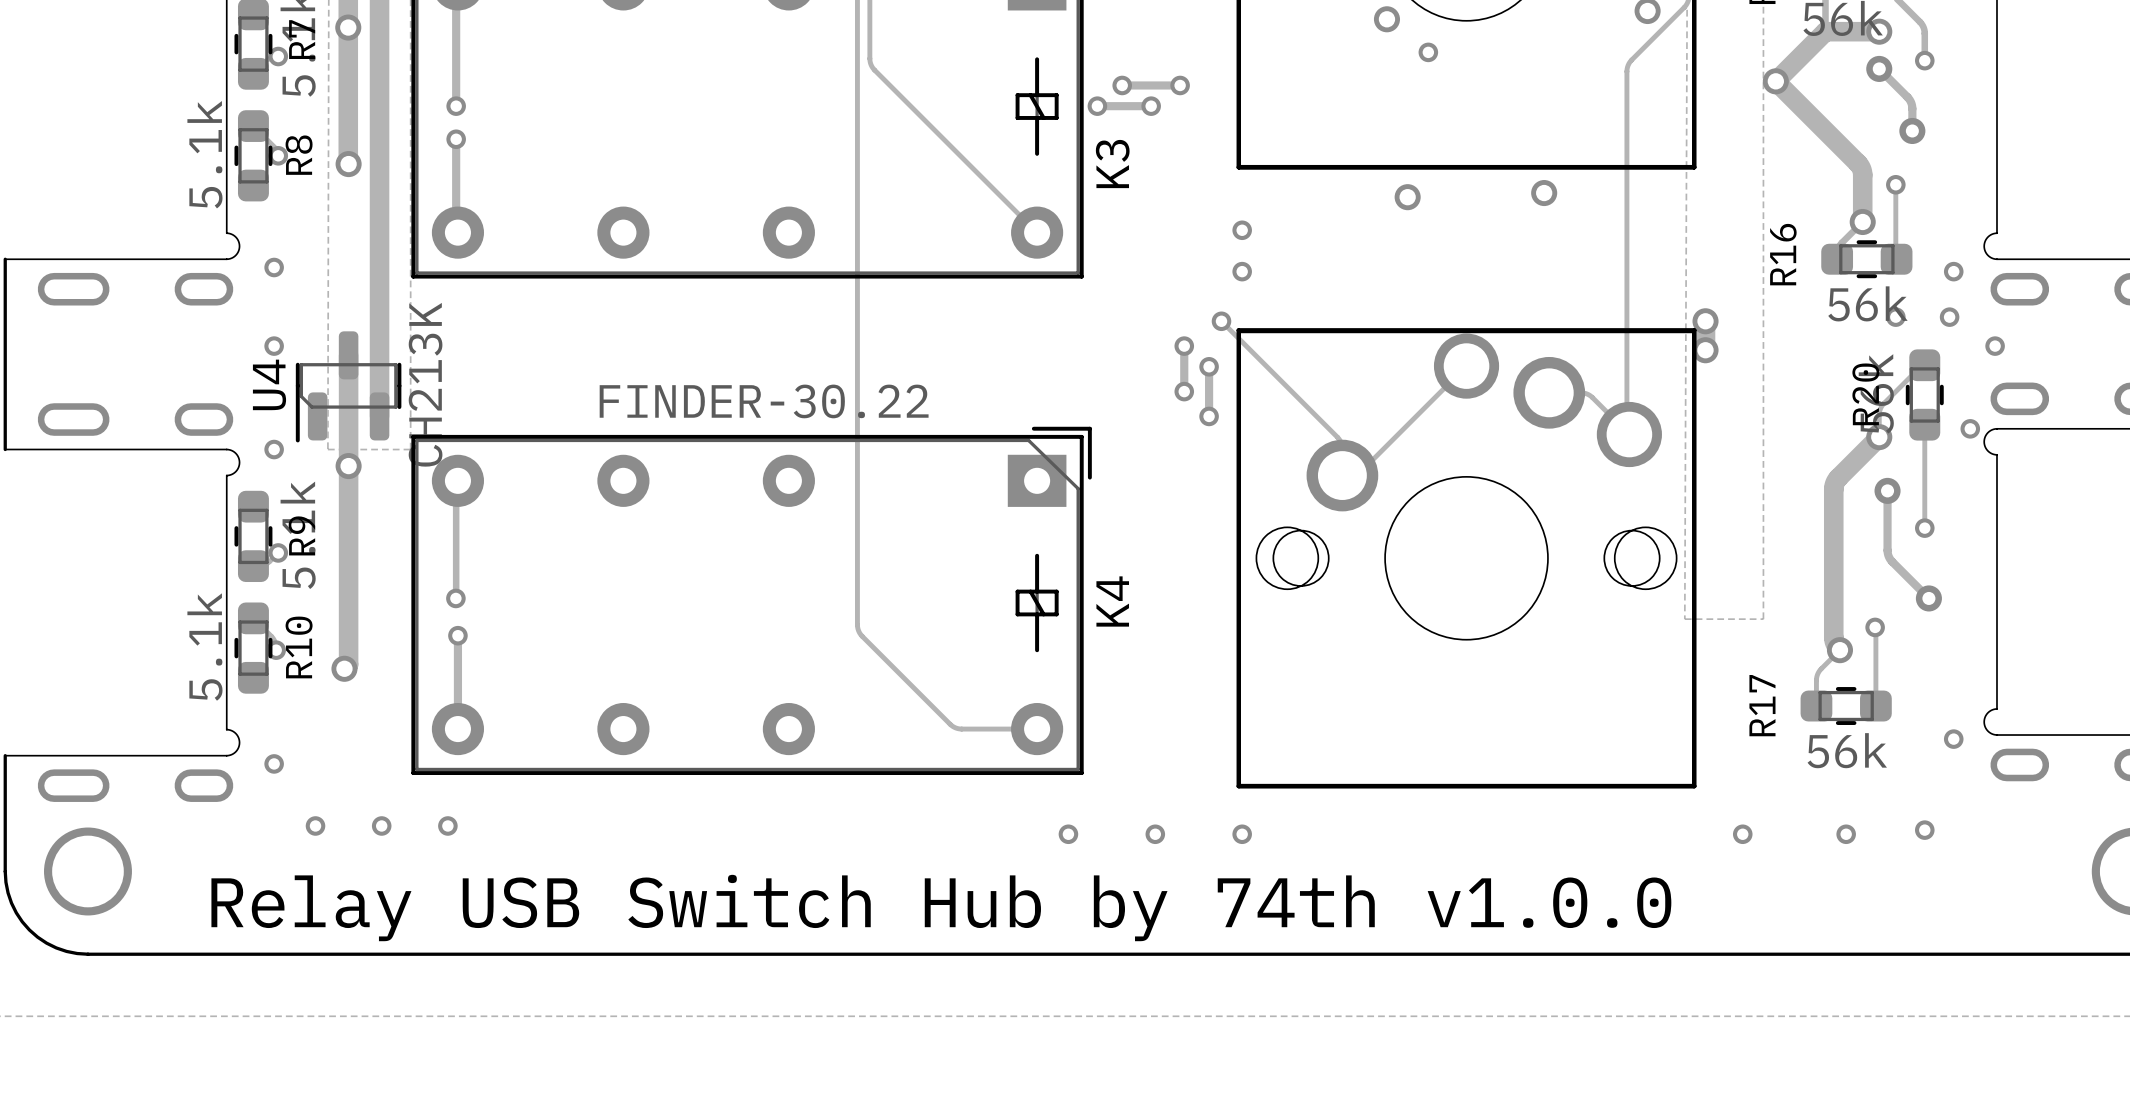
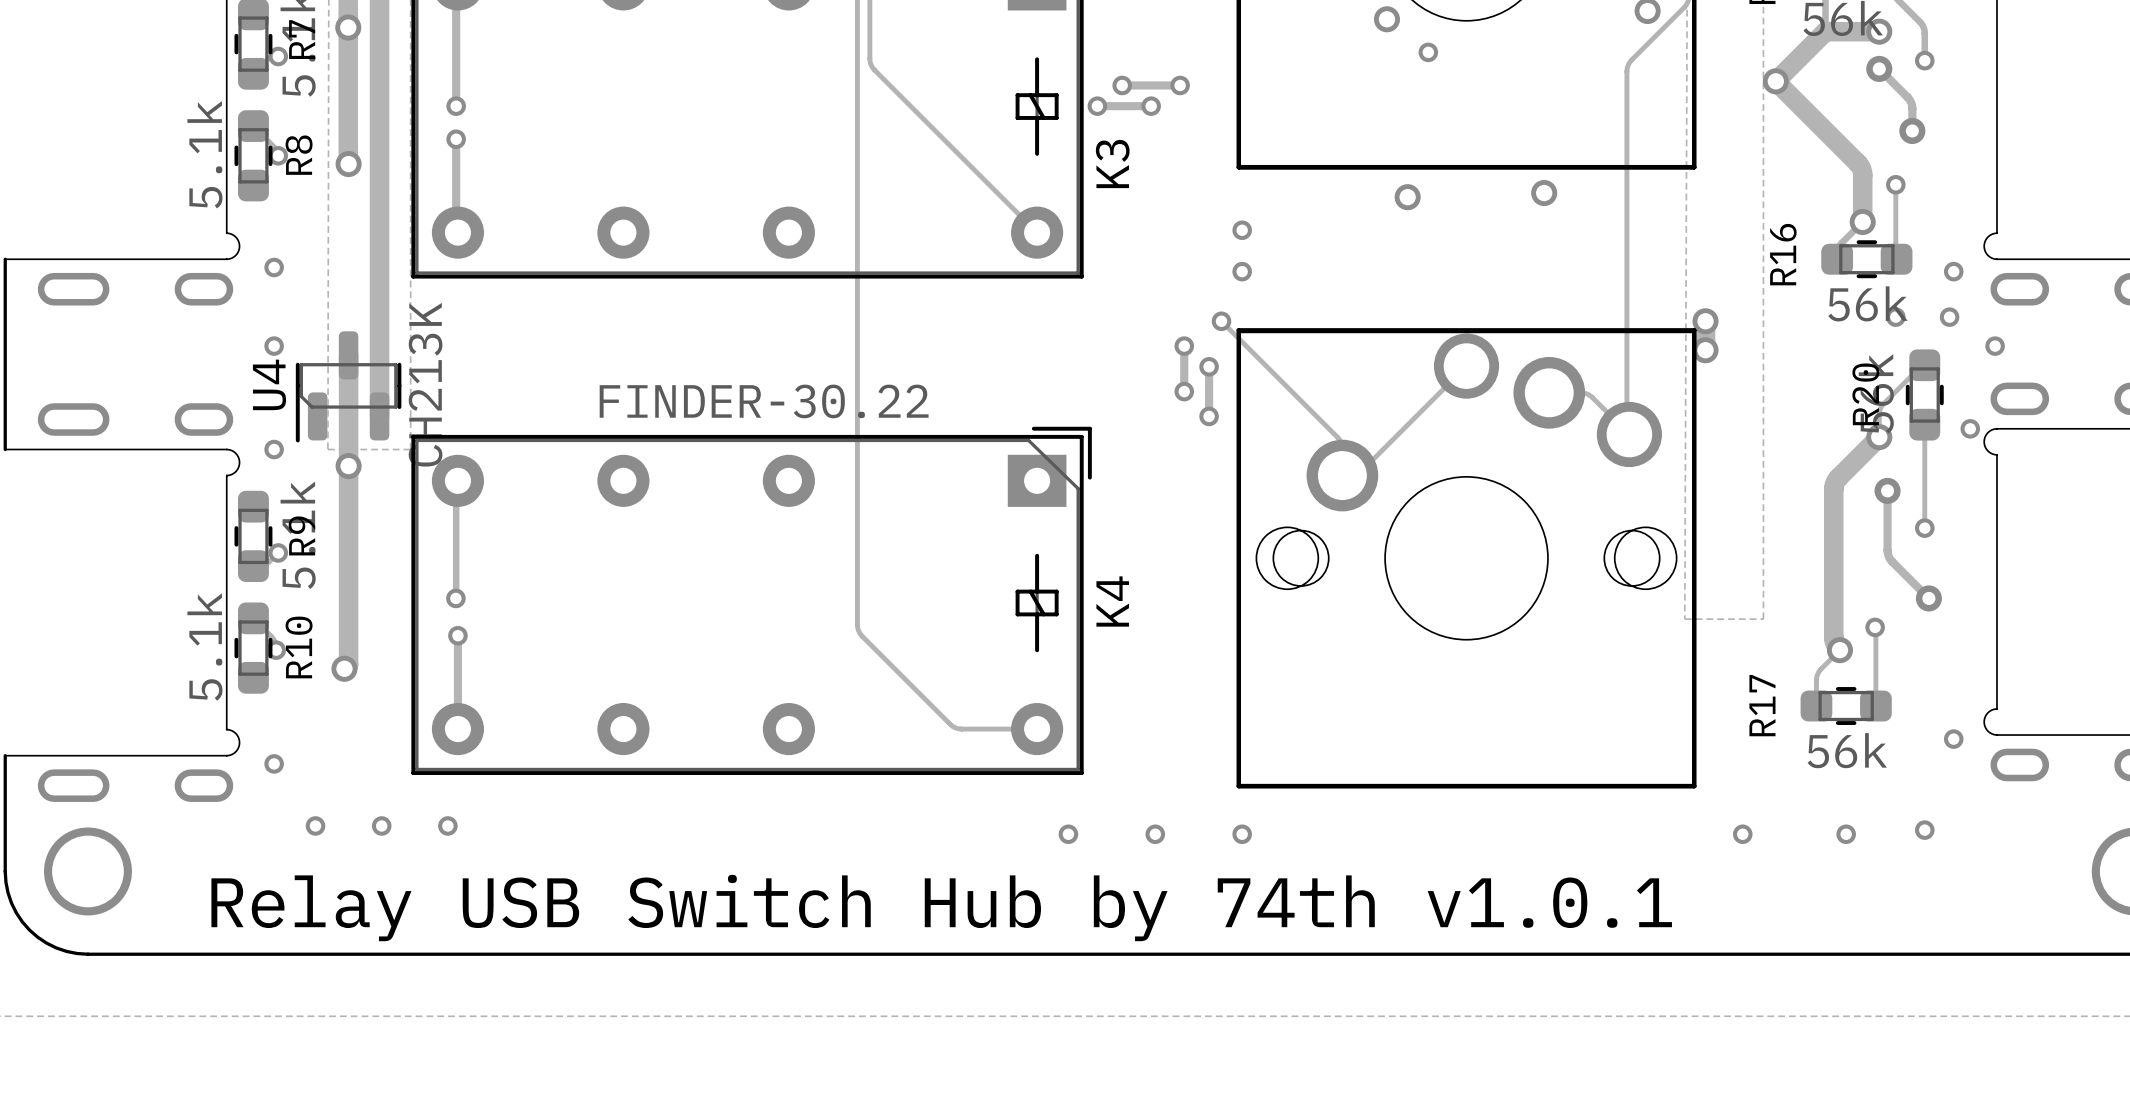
text: Relay USB Switch Hub by 74th v1.0.0 (941, 908) -> Relay USB Switch Hub by 74th v1.0.1 (941, 908)

